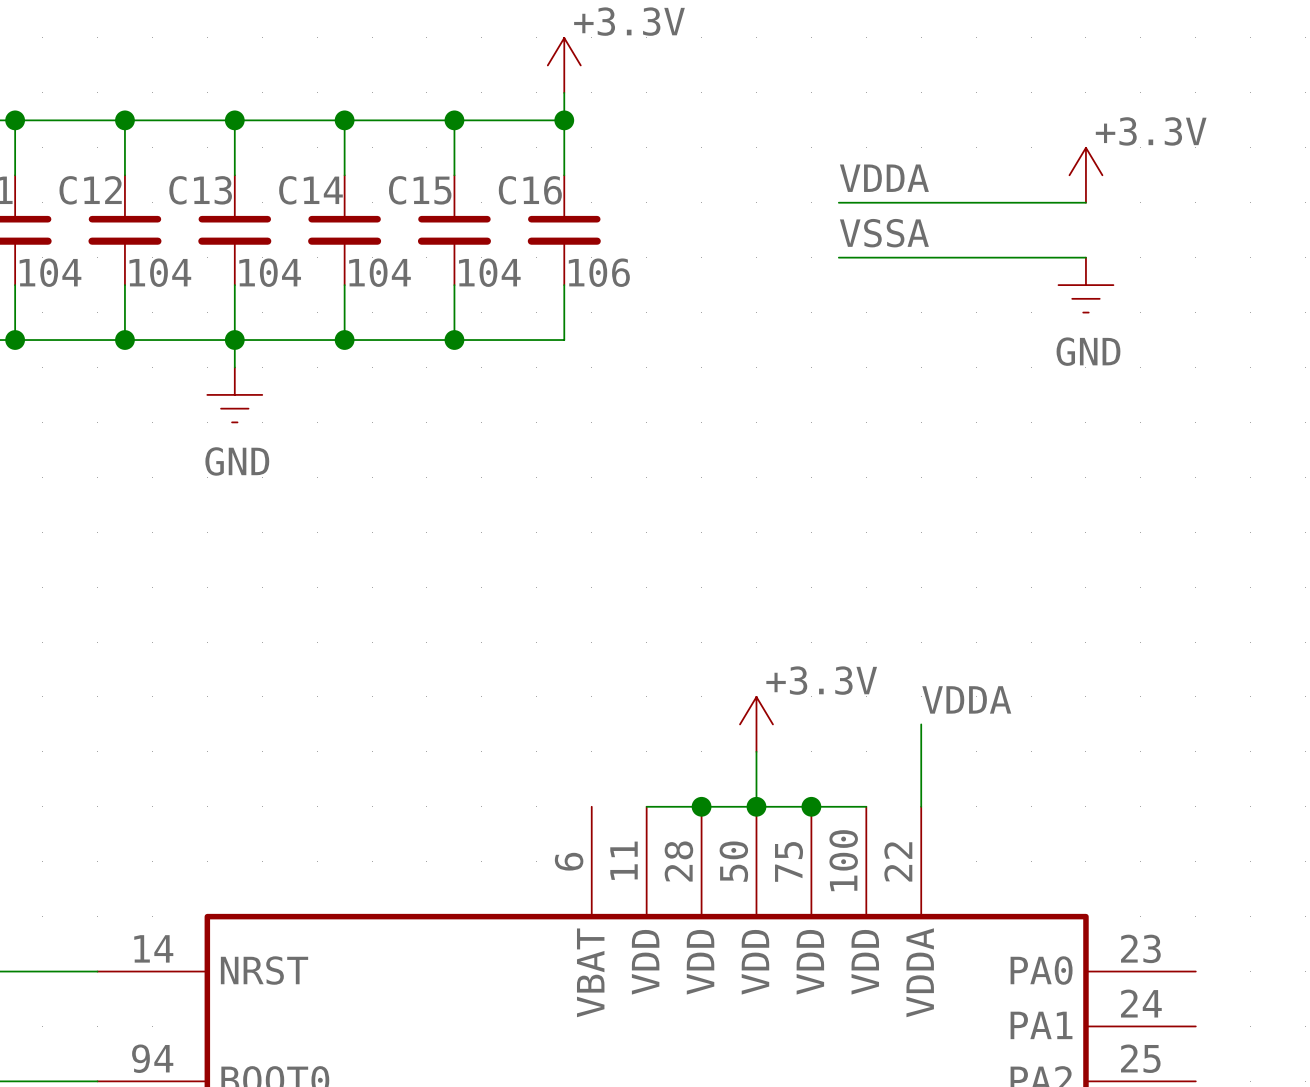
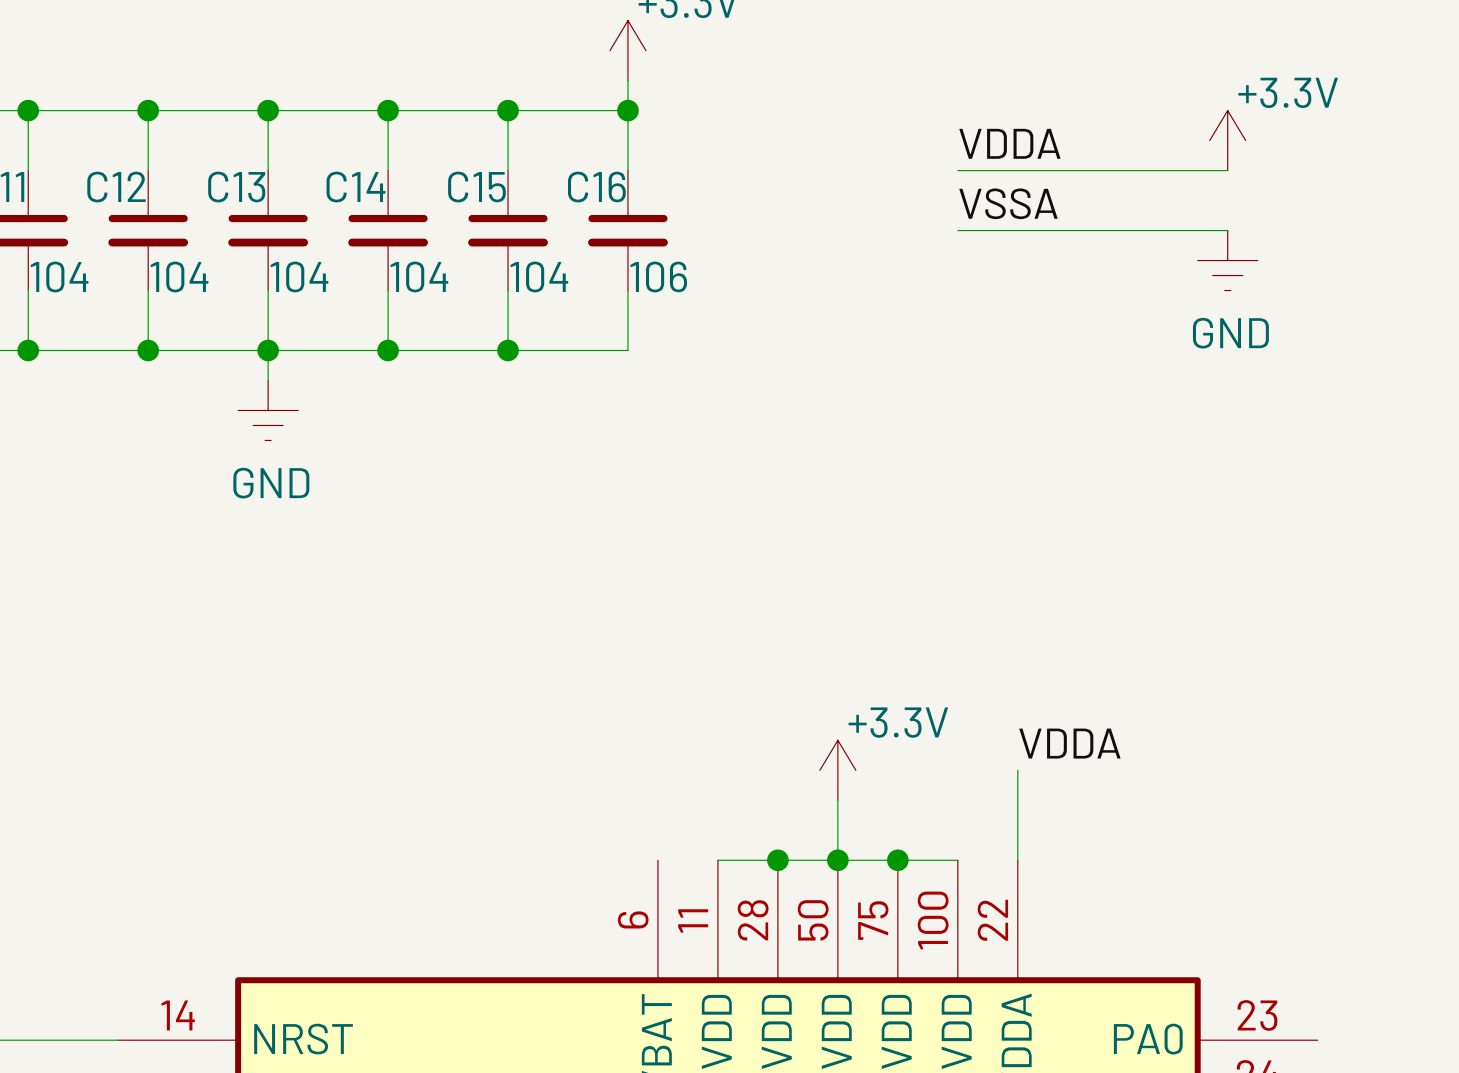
power symbol position: +3.3V (1085, 175) -> +3.3V (1227, 140)
label position: VDDA (884, 178) -> VDDA (1009, 143)
wire: (838, 202) (1085, 202) -> (957, 170) (1227, 170)
label position: VSSA (884, 233) -> VSSA (1008, 203)
wire: (838, 257) (1085, 257) -> (957, 230) (1227, 230)
power symbol position: GND (1085, 285) -> GND (1227, 260)

